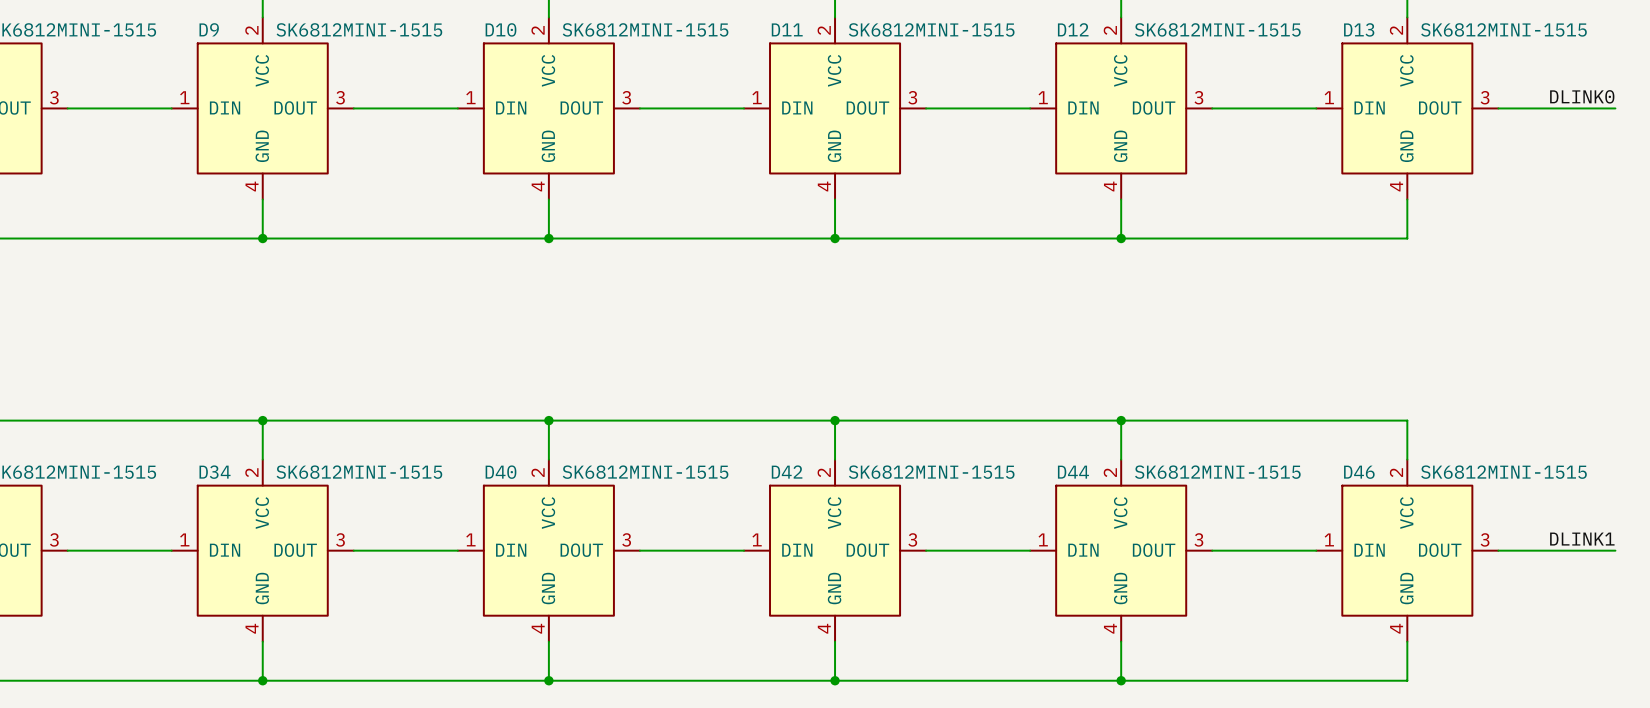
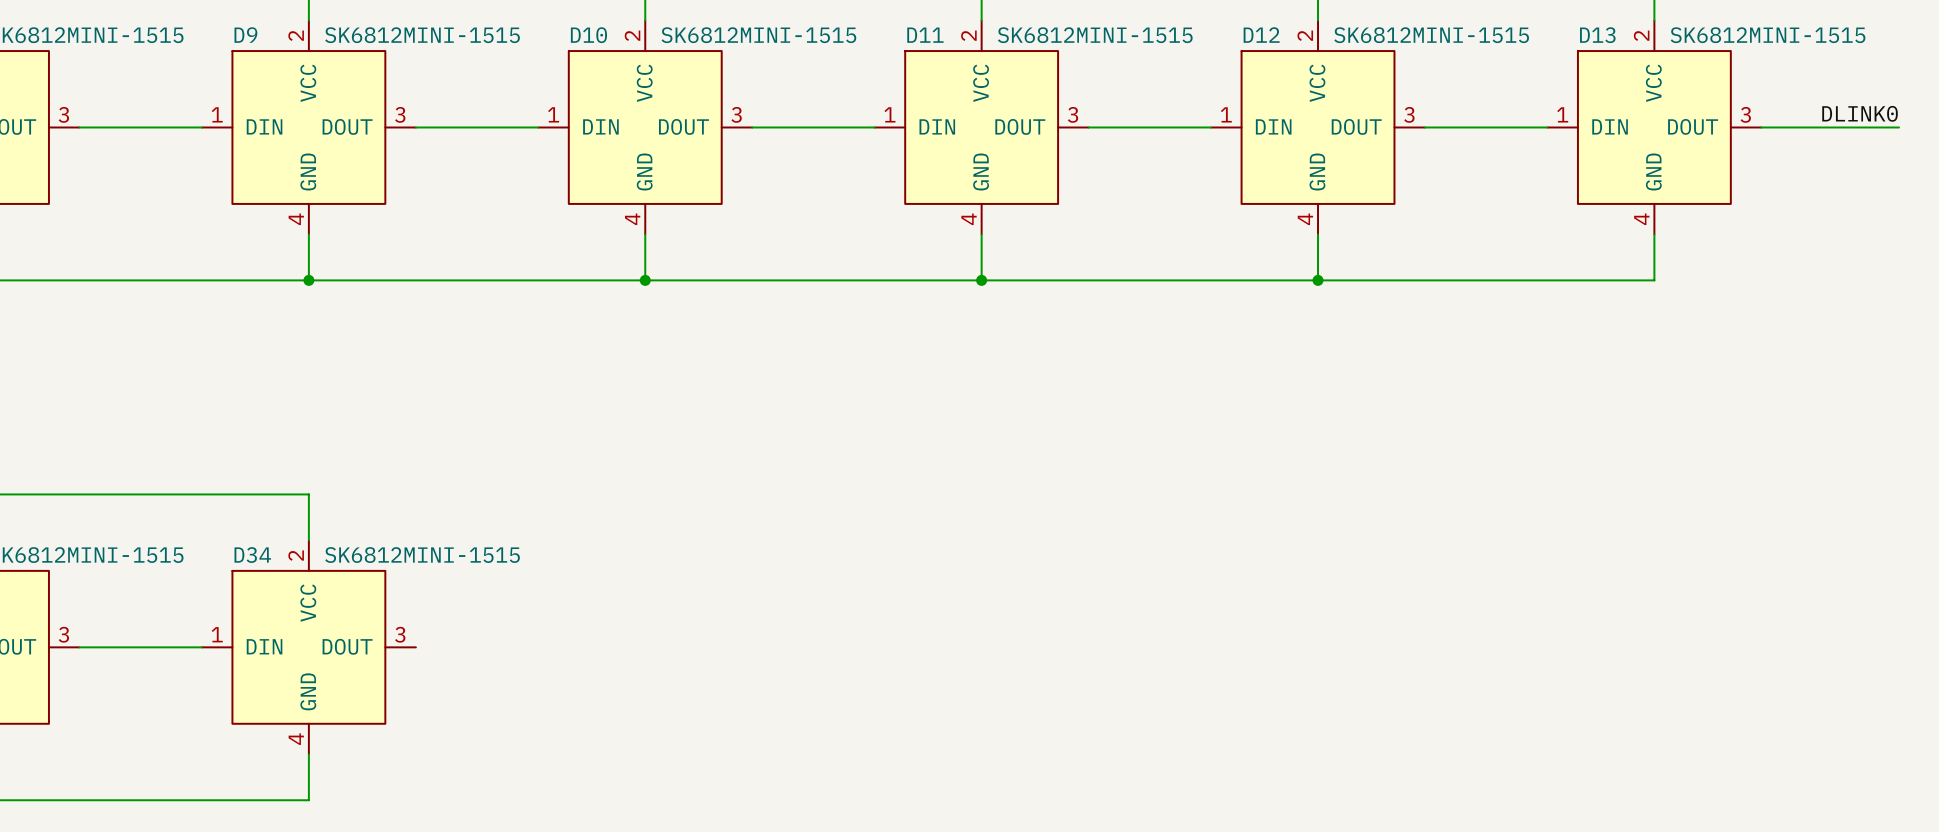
wire: (262, 420) (1407, 420) (1407, 459) -> none
junction: (262, 420) -> none
wire: (548, 420) (548, 459) -> none
junction: (548, 420) -> none
wire: (835, 420) (835, 459) -> none
junction: (835, 420) -> none
wire: (1121, 420) (1121, 459) -> none
junction: (1121, 420) -> none
label: DLINK1 (1582, 539) -> none
wire: (353, 550) (457, 550) -> none
D40: SK6812MINI-1515 (548, 550) -> none
wire: (639, 550) (743, 550) -> none
D42: SK6812MINI-1515 (835, 550) -> none
wire: (926, 550) (1030, 550) -> none
D44: SK6812MINI-1515 (1121, 550) -> none
wire: (1212, 550) (1316, 550) -> none
D46: SK6812MINI-1515 (1407, 550) -> none
wire: (1498, 550) (1615, 550) -> none
wire: (548, 641) (548, 680) -> none
wire: (835, 641) (835, 680) -> none
wire: (1121, 641) (1121, 680) -> none
wire: (1407, 641) (1407, 680) (262, 680) -> none
junction: (262, 680) -> none
junction: (548, 680) -> none
junction: (835, 680) -> none
junction: (1121, 680) -> none

